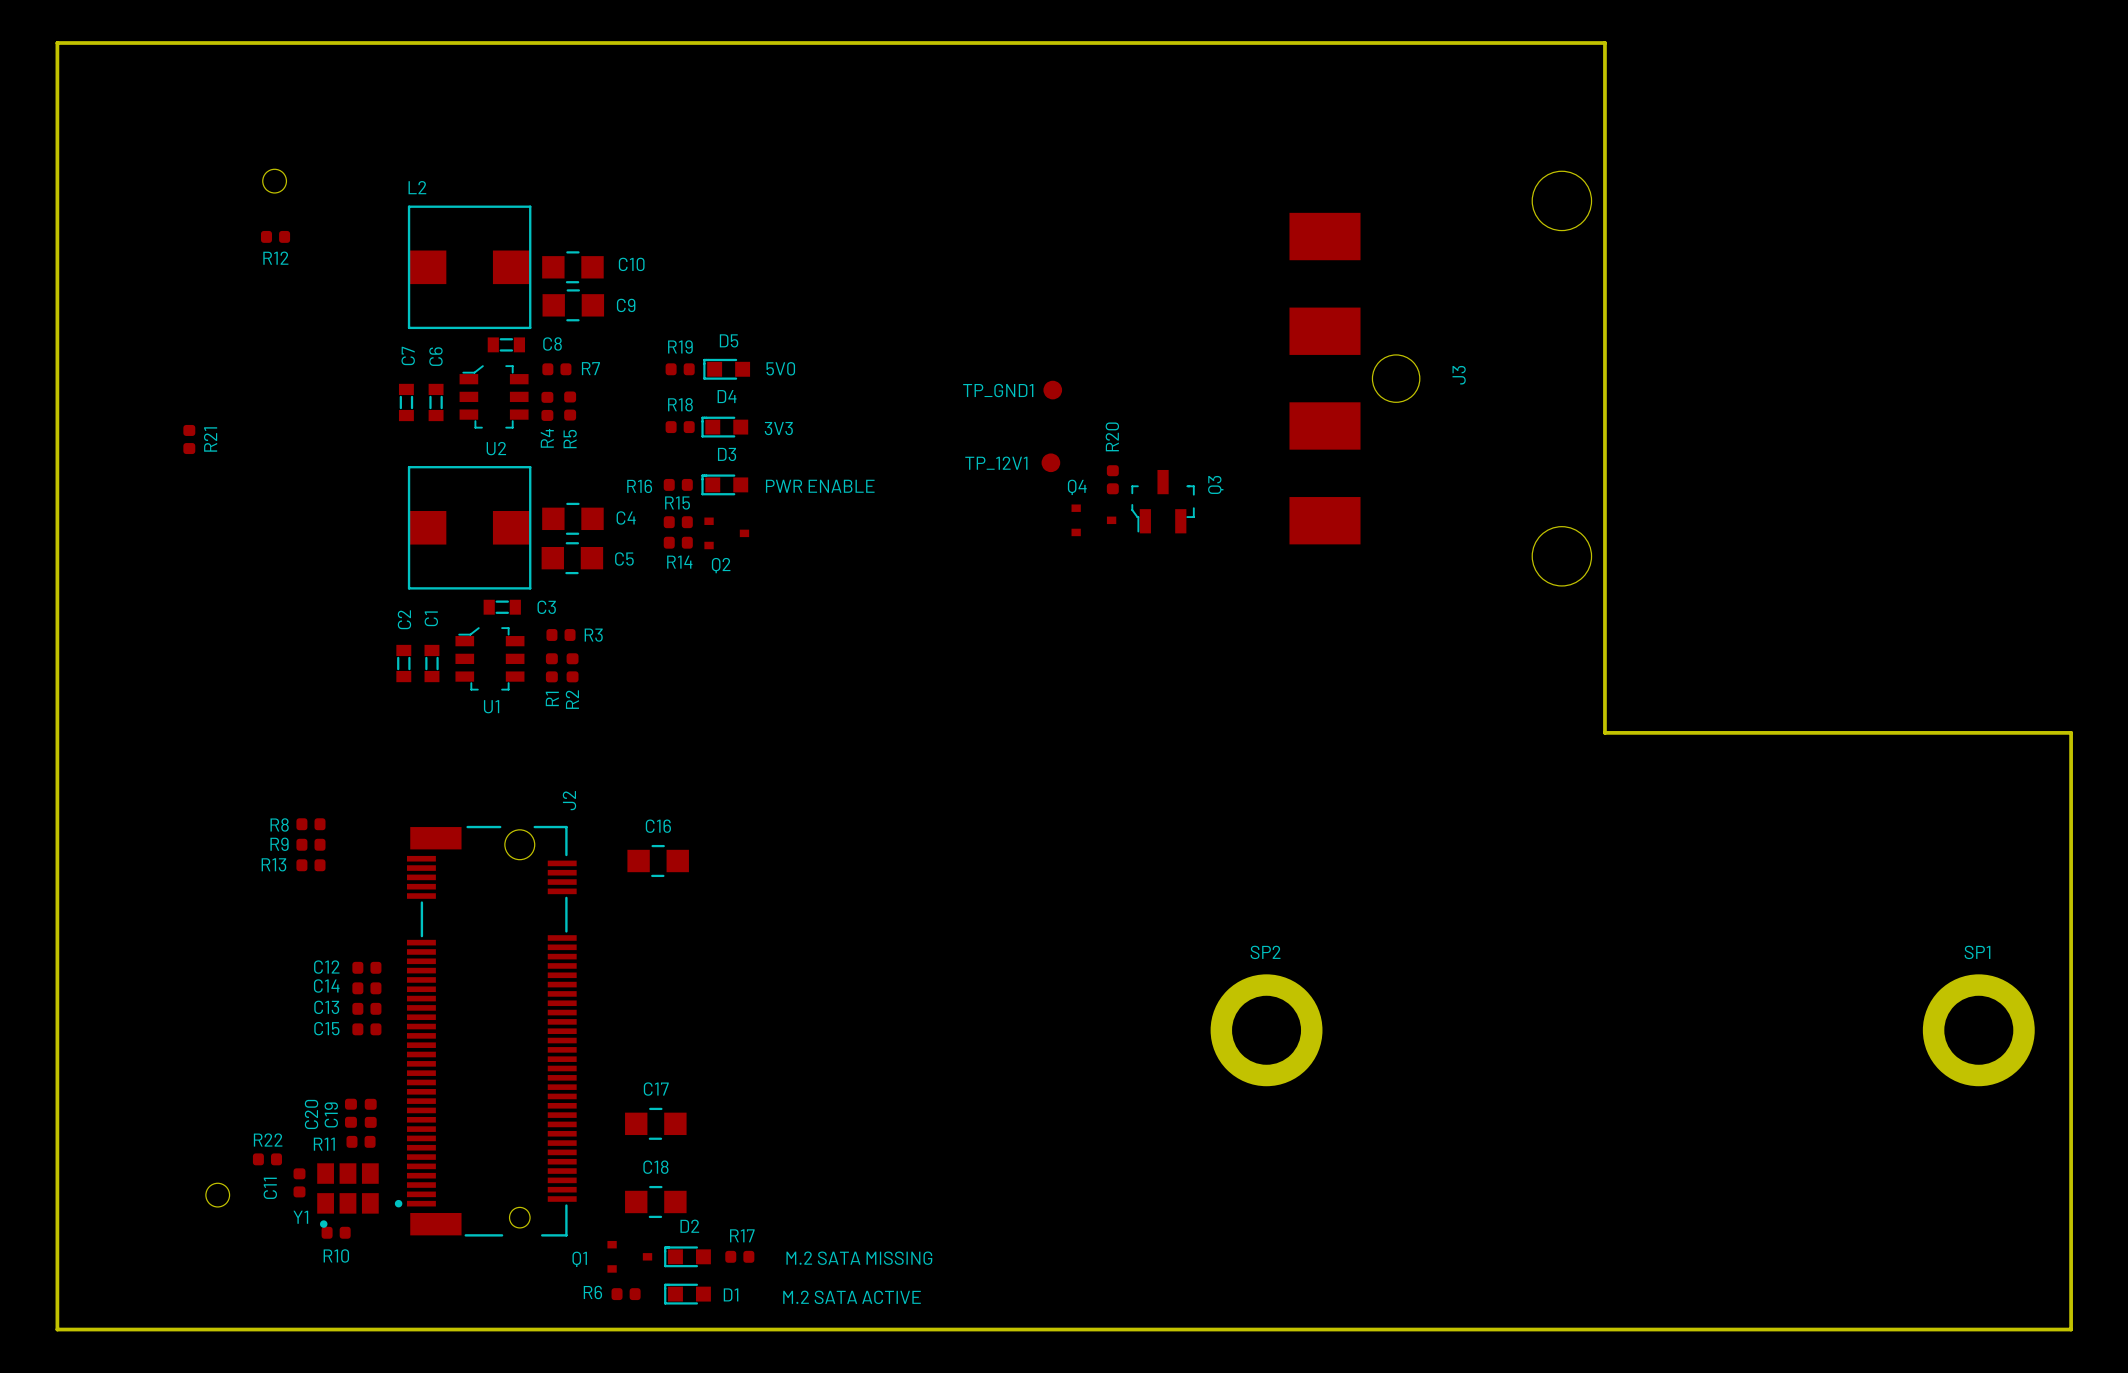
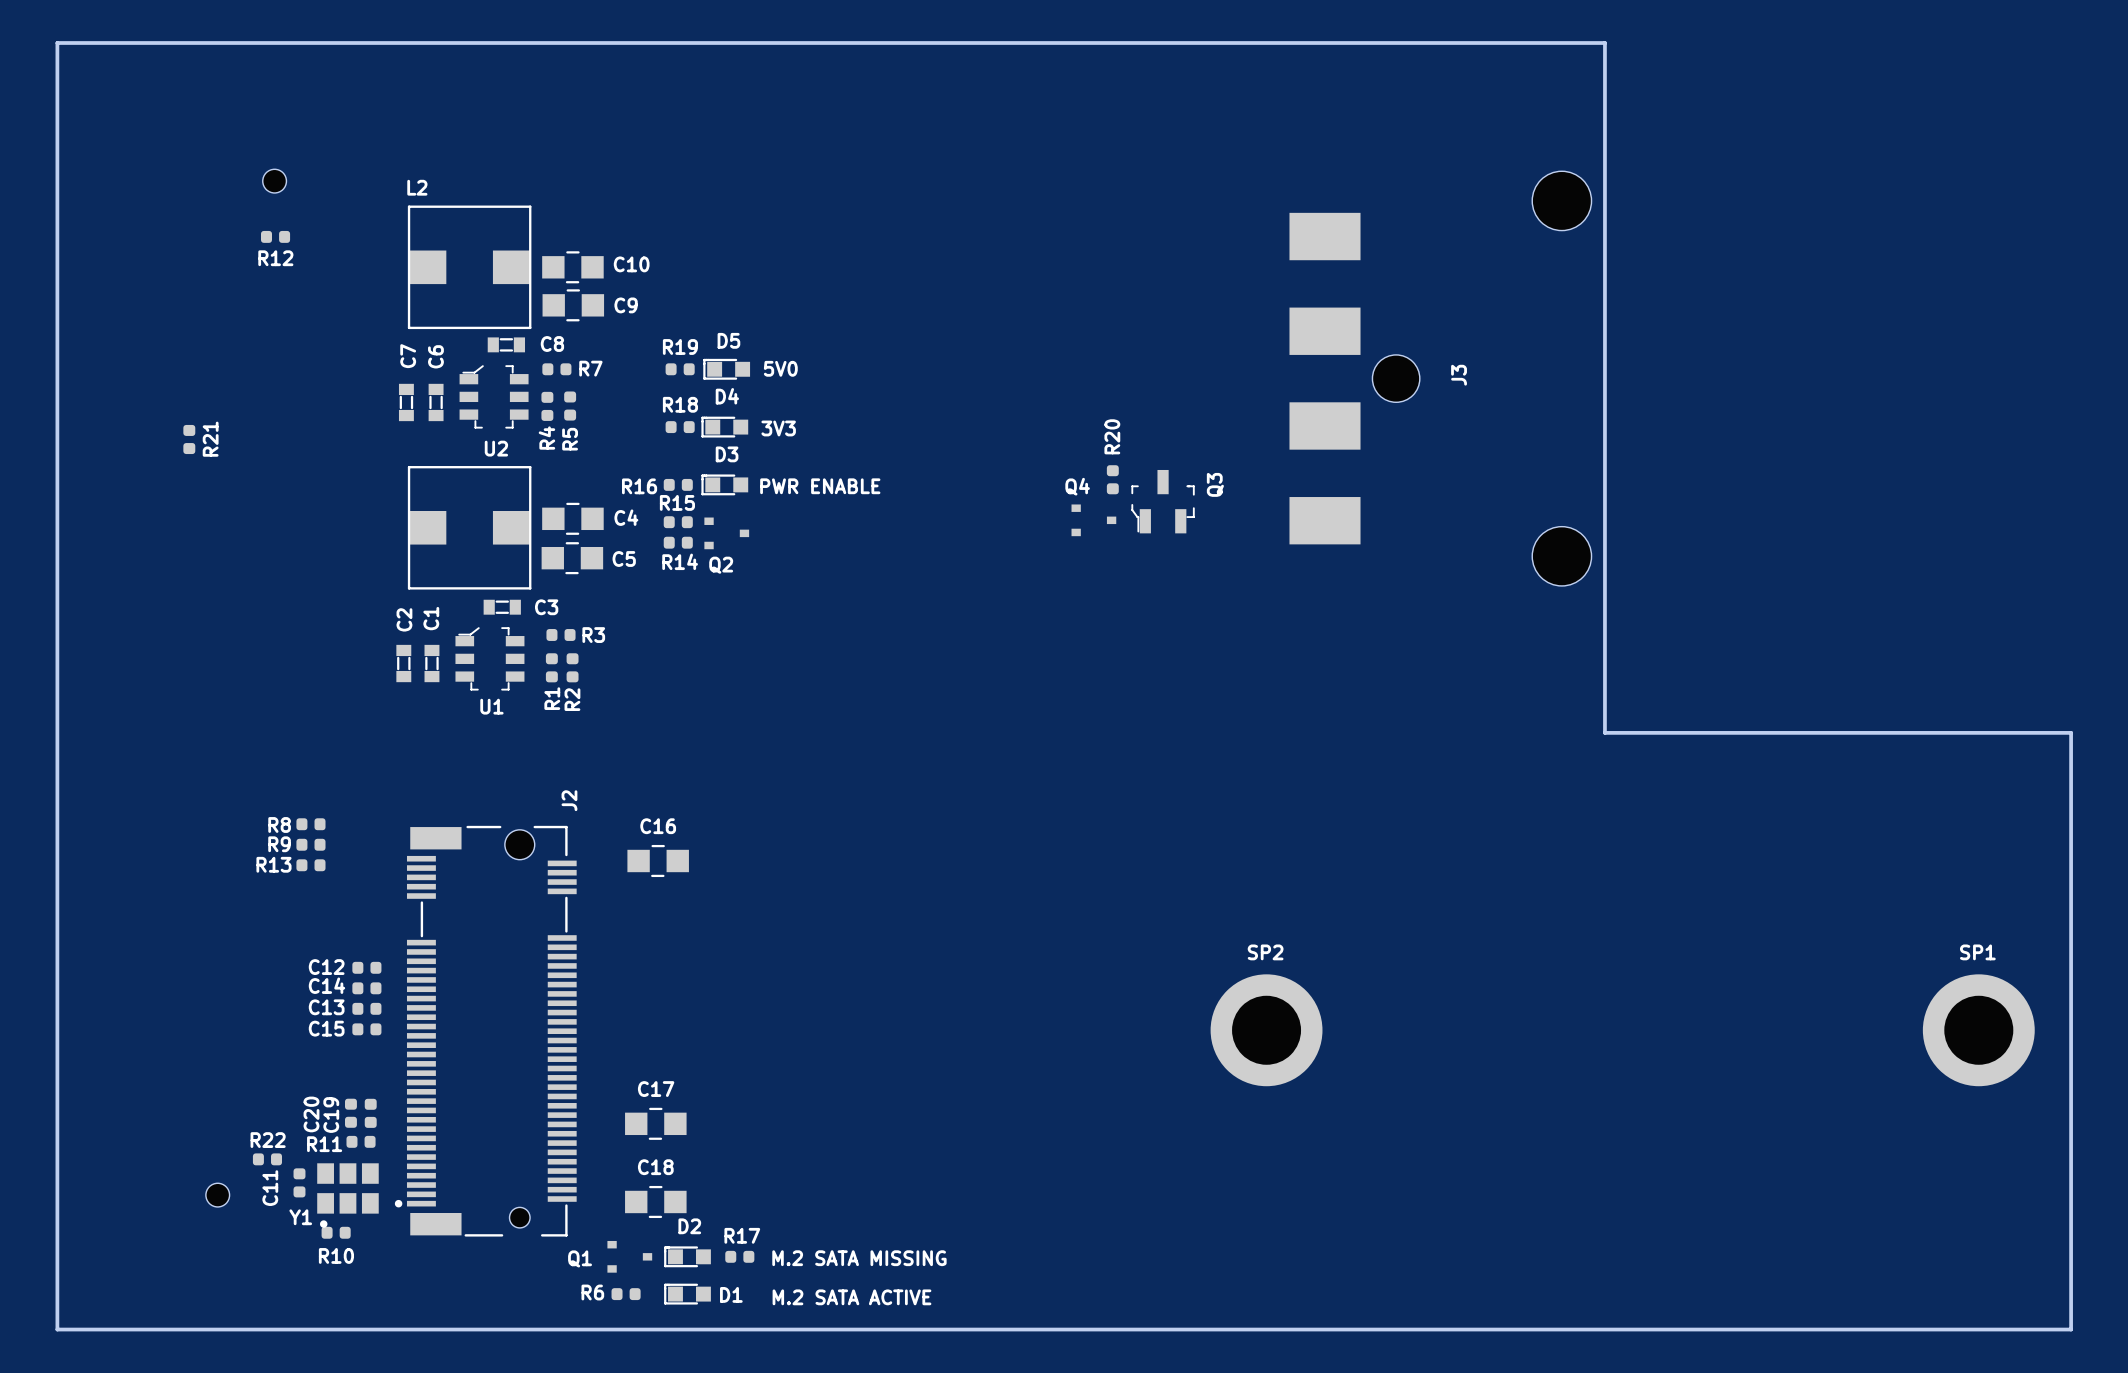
TP_GND1: (1052, 390) -> none
TP_12V1: (1050, 462) -> none

